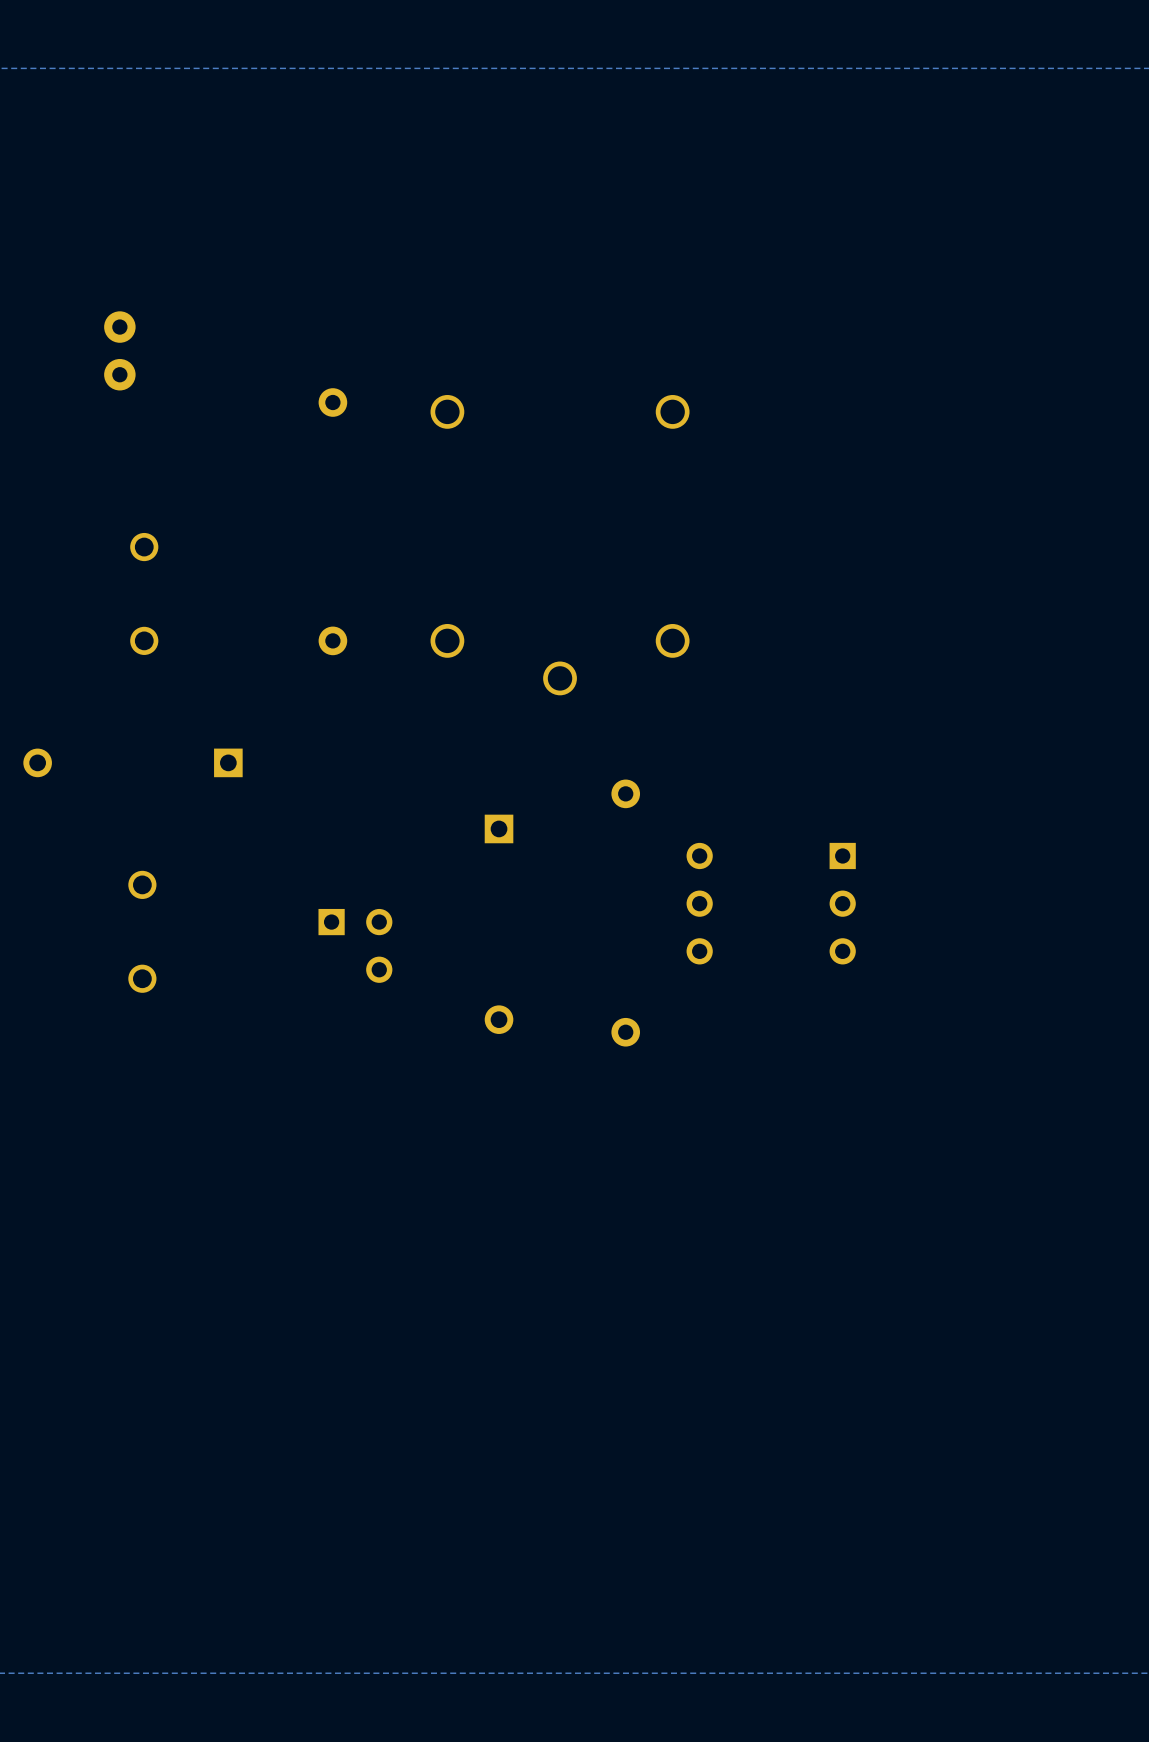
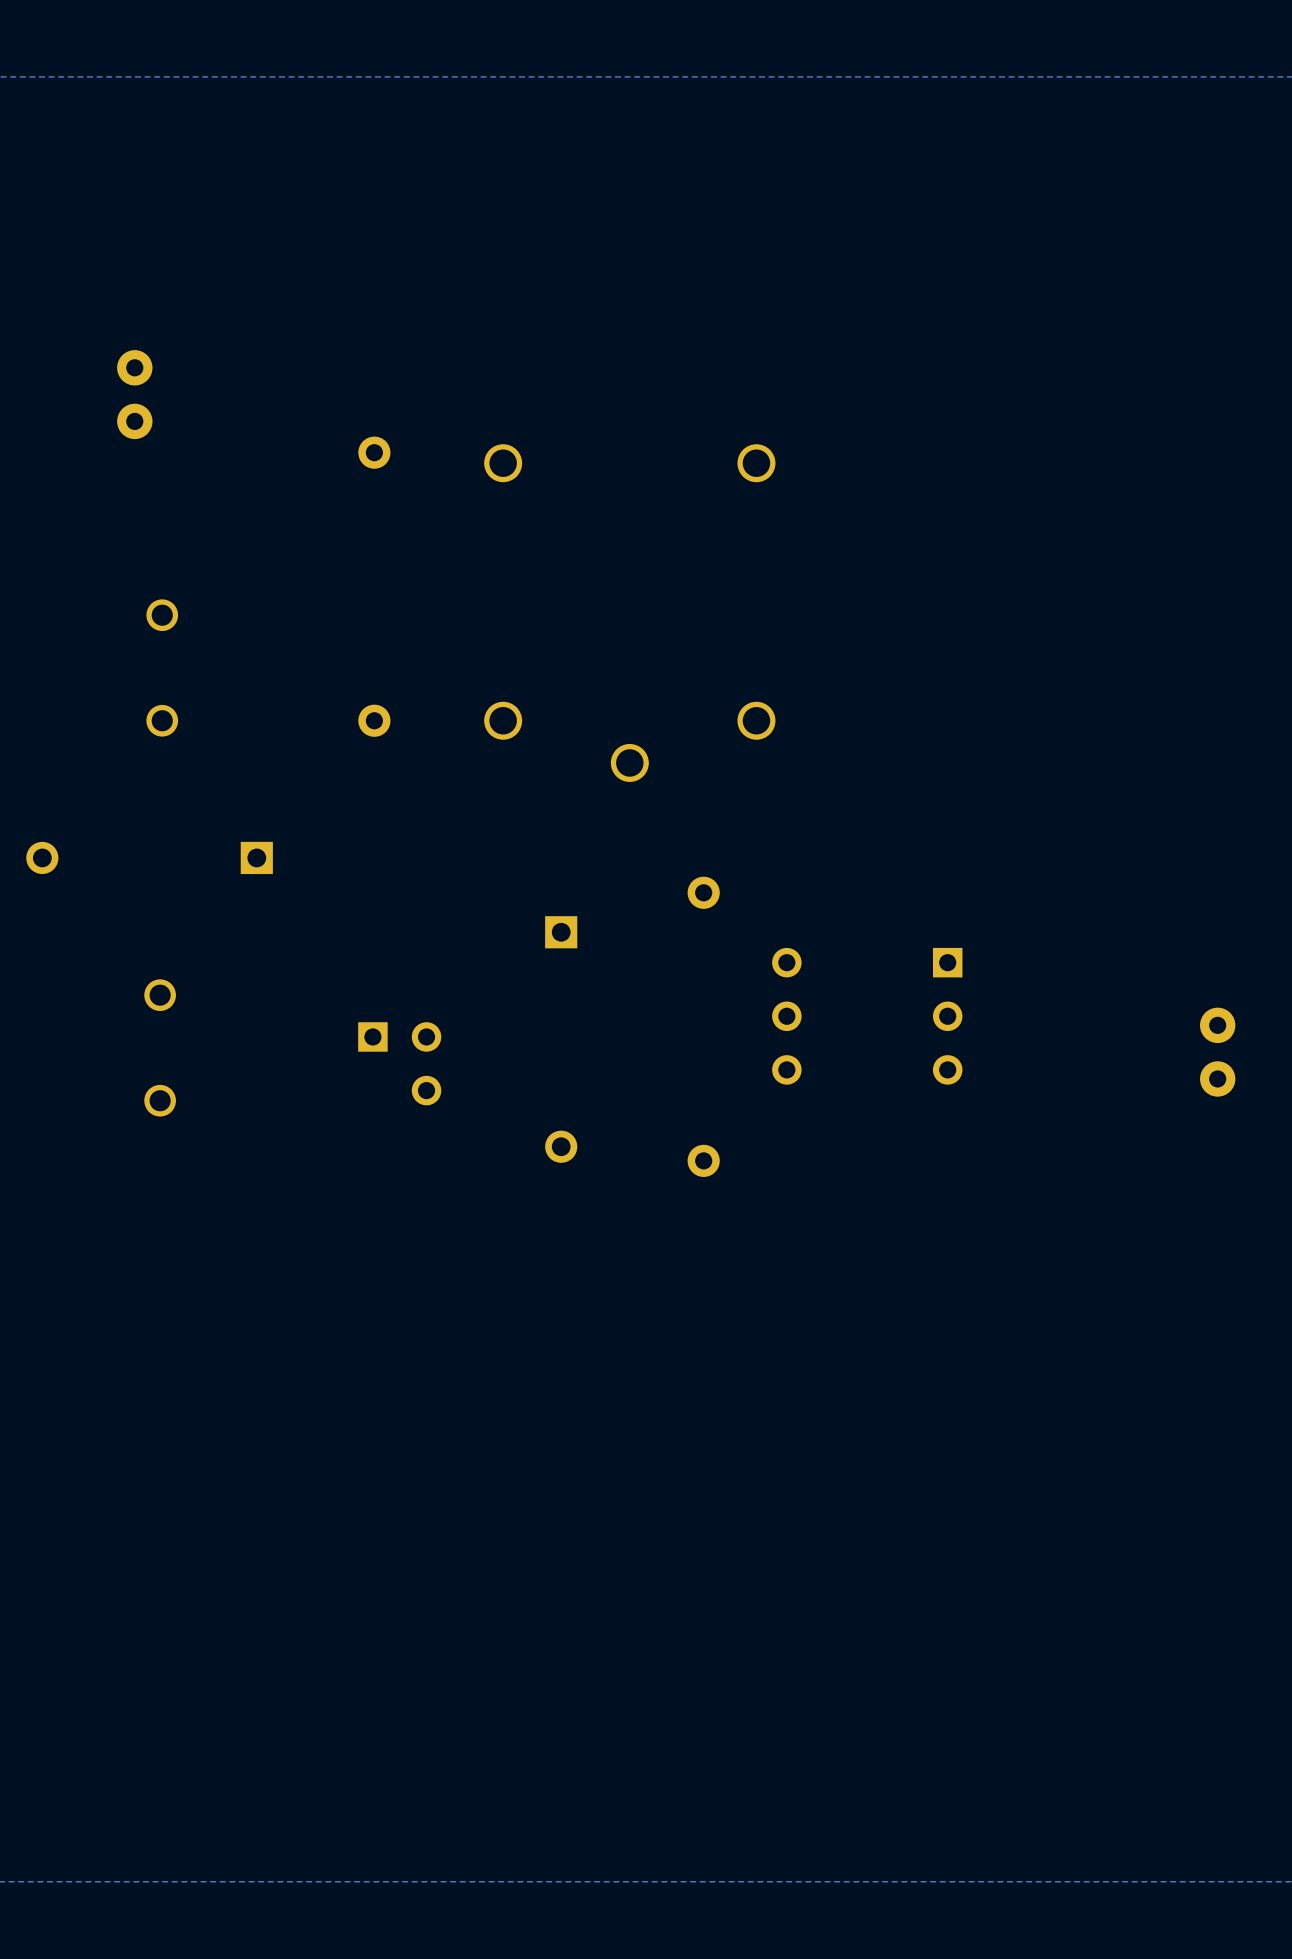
part: none -> (1217, 1052)

